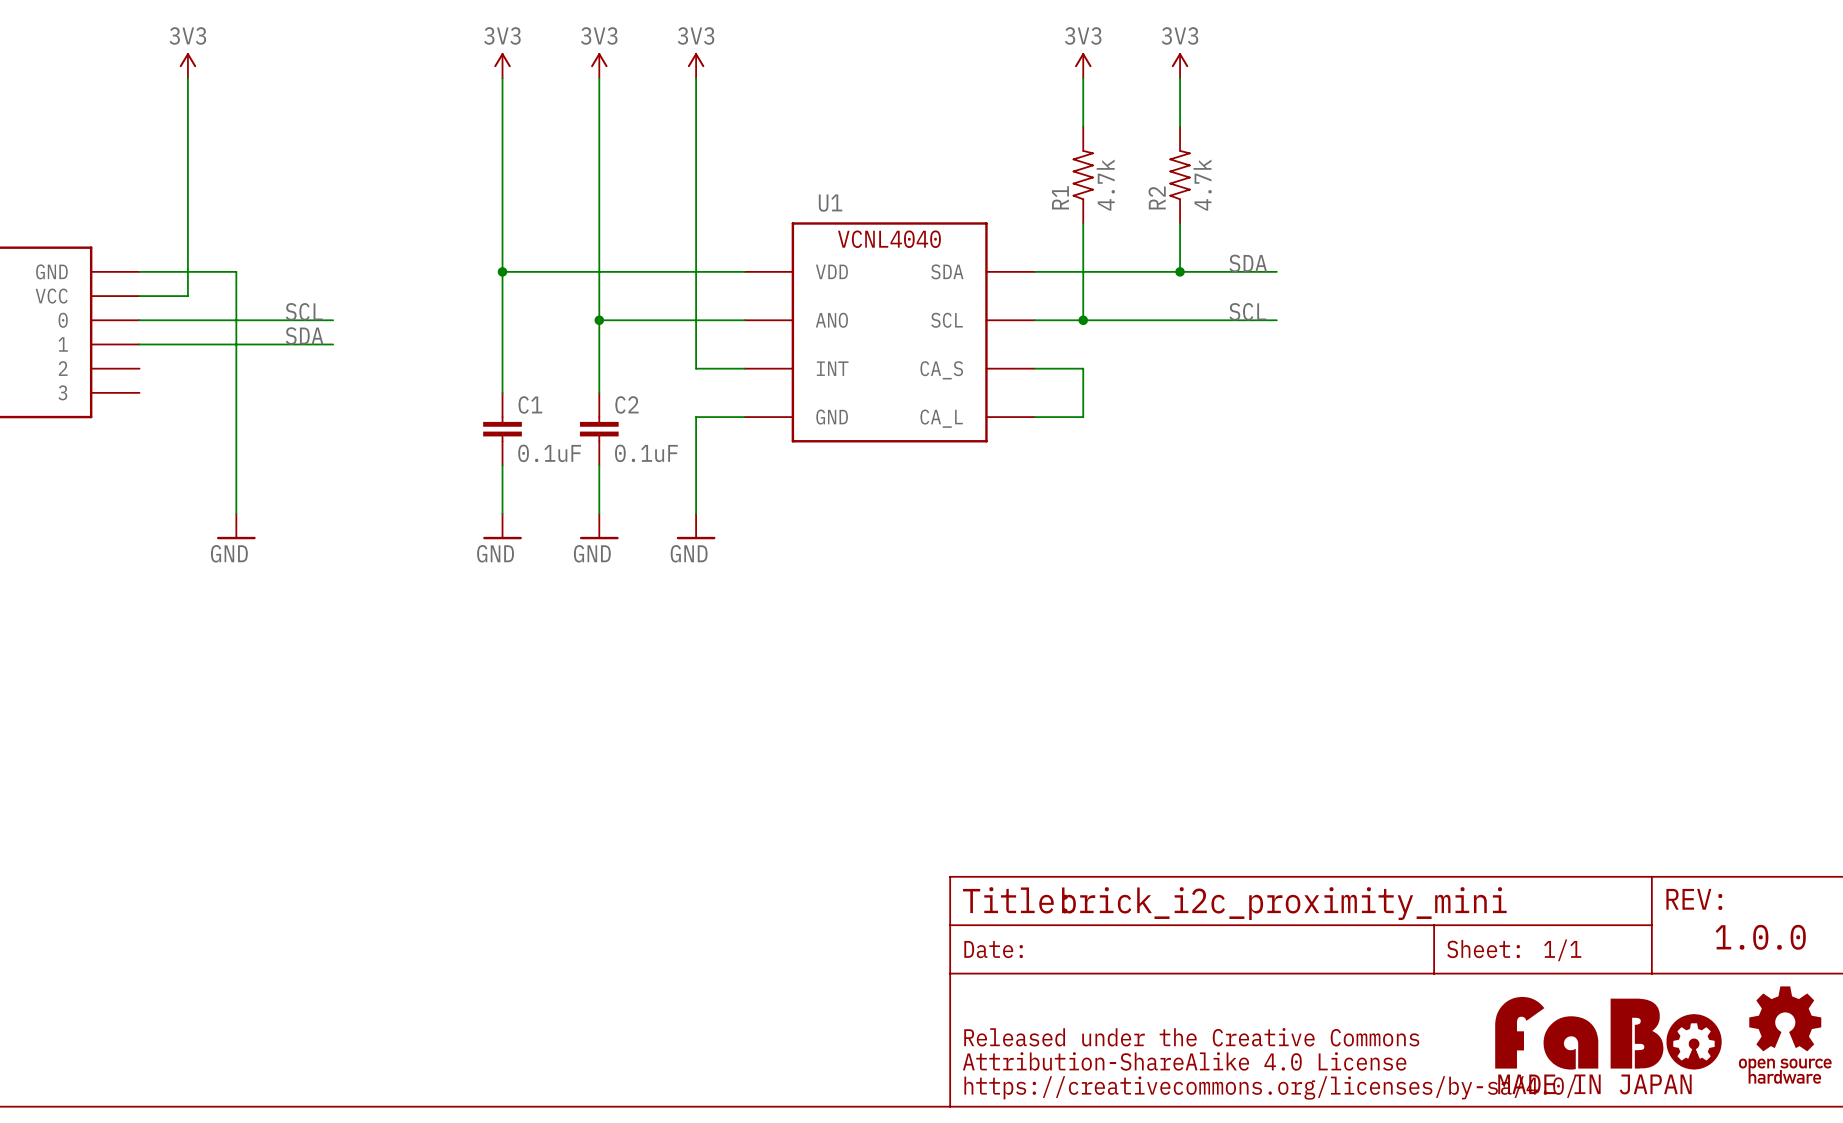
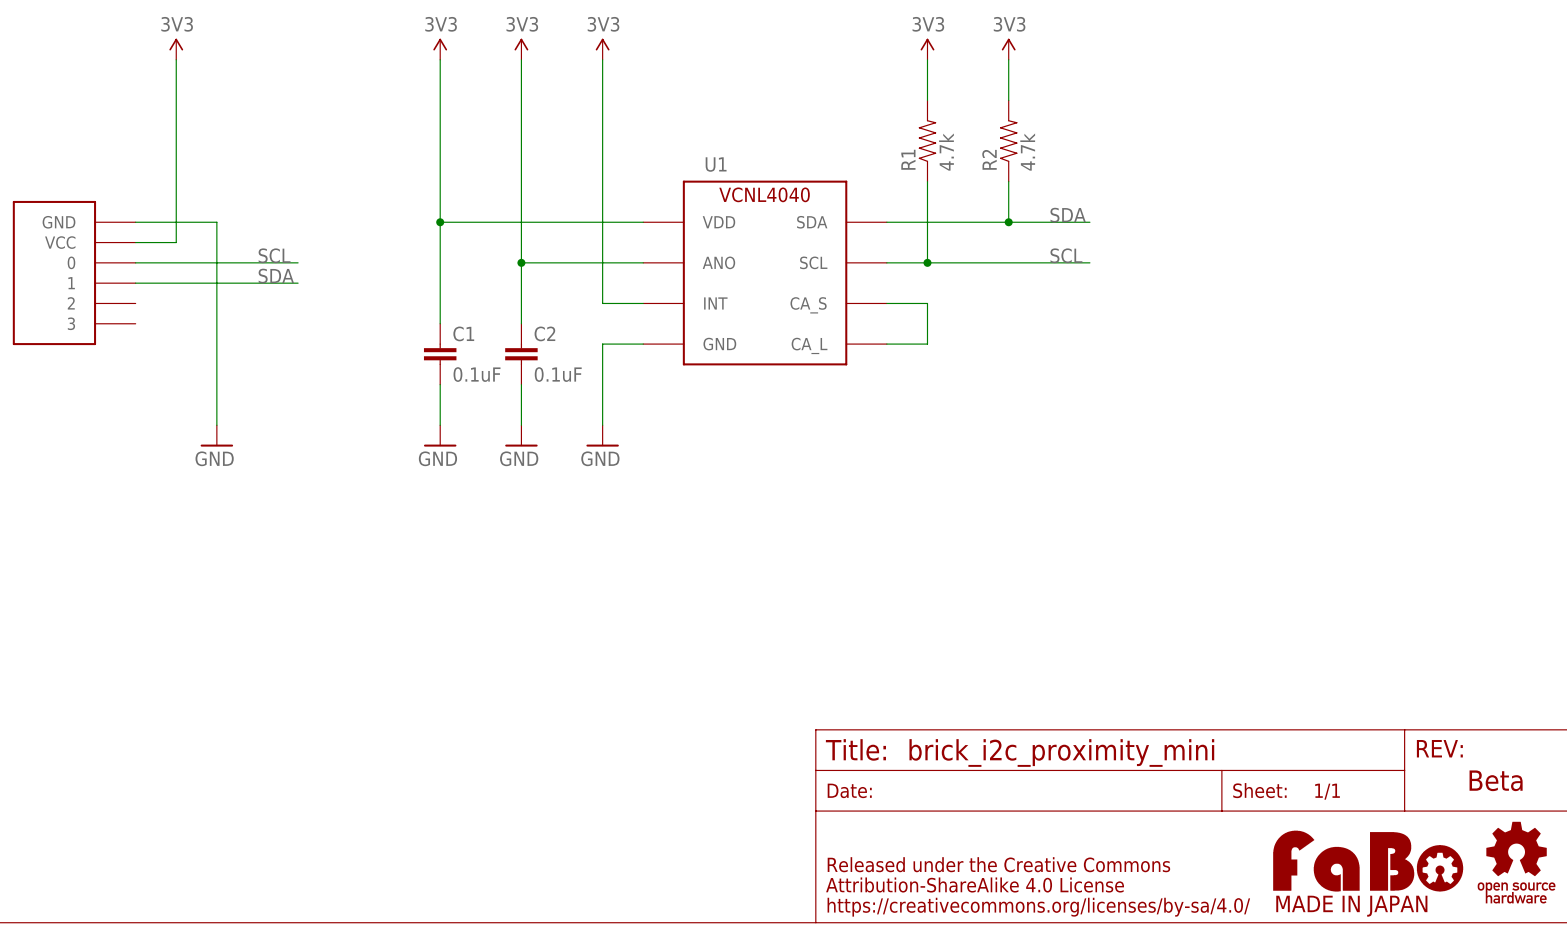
text: 1.0.0 (1760, 937) -> Beta (1496, 780)

